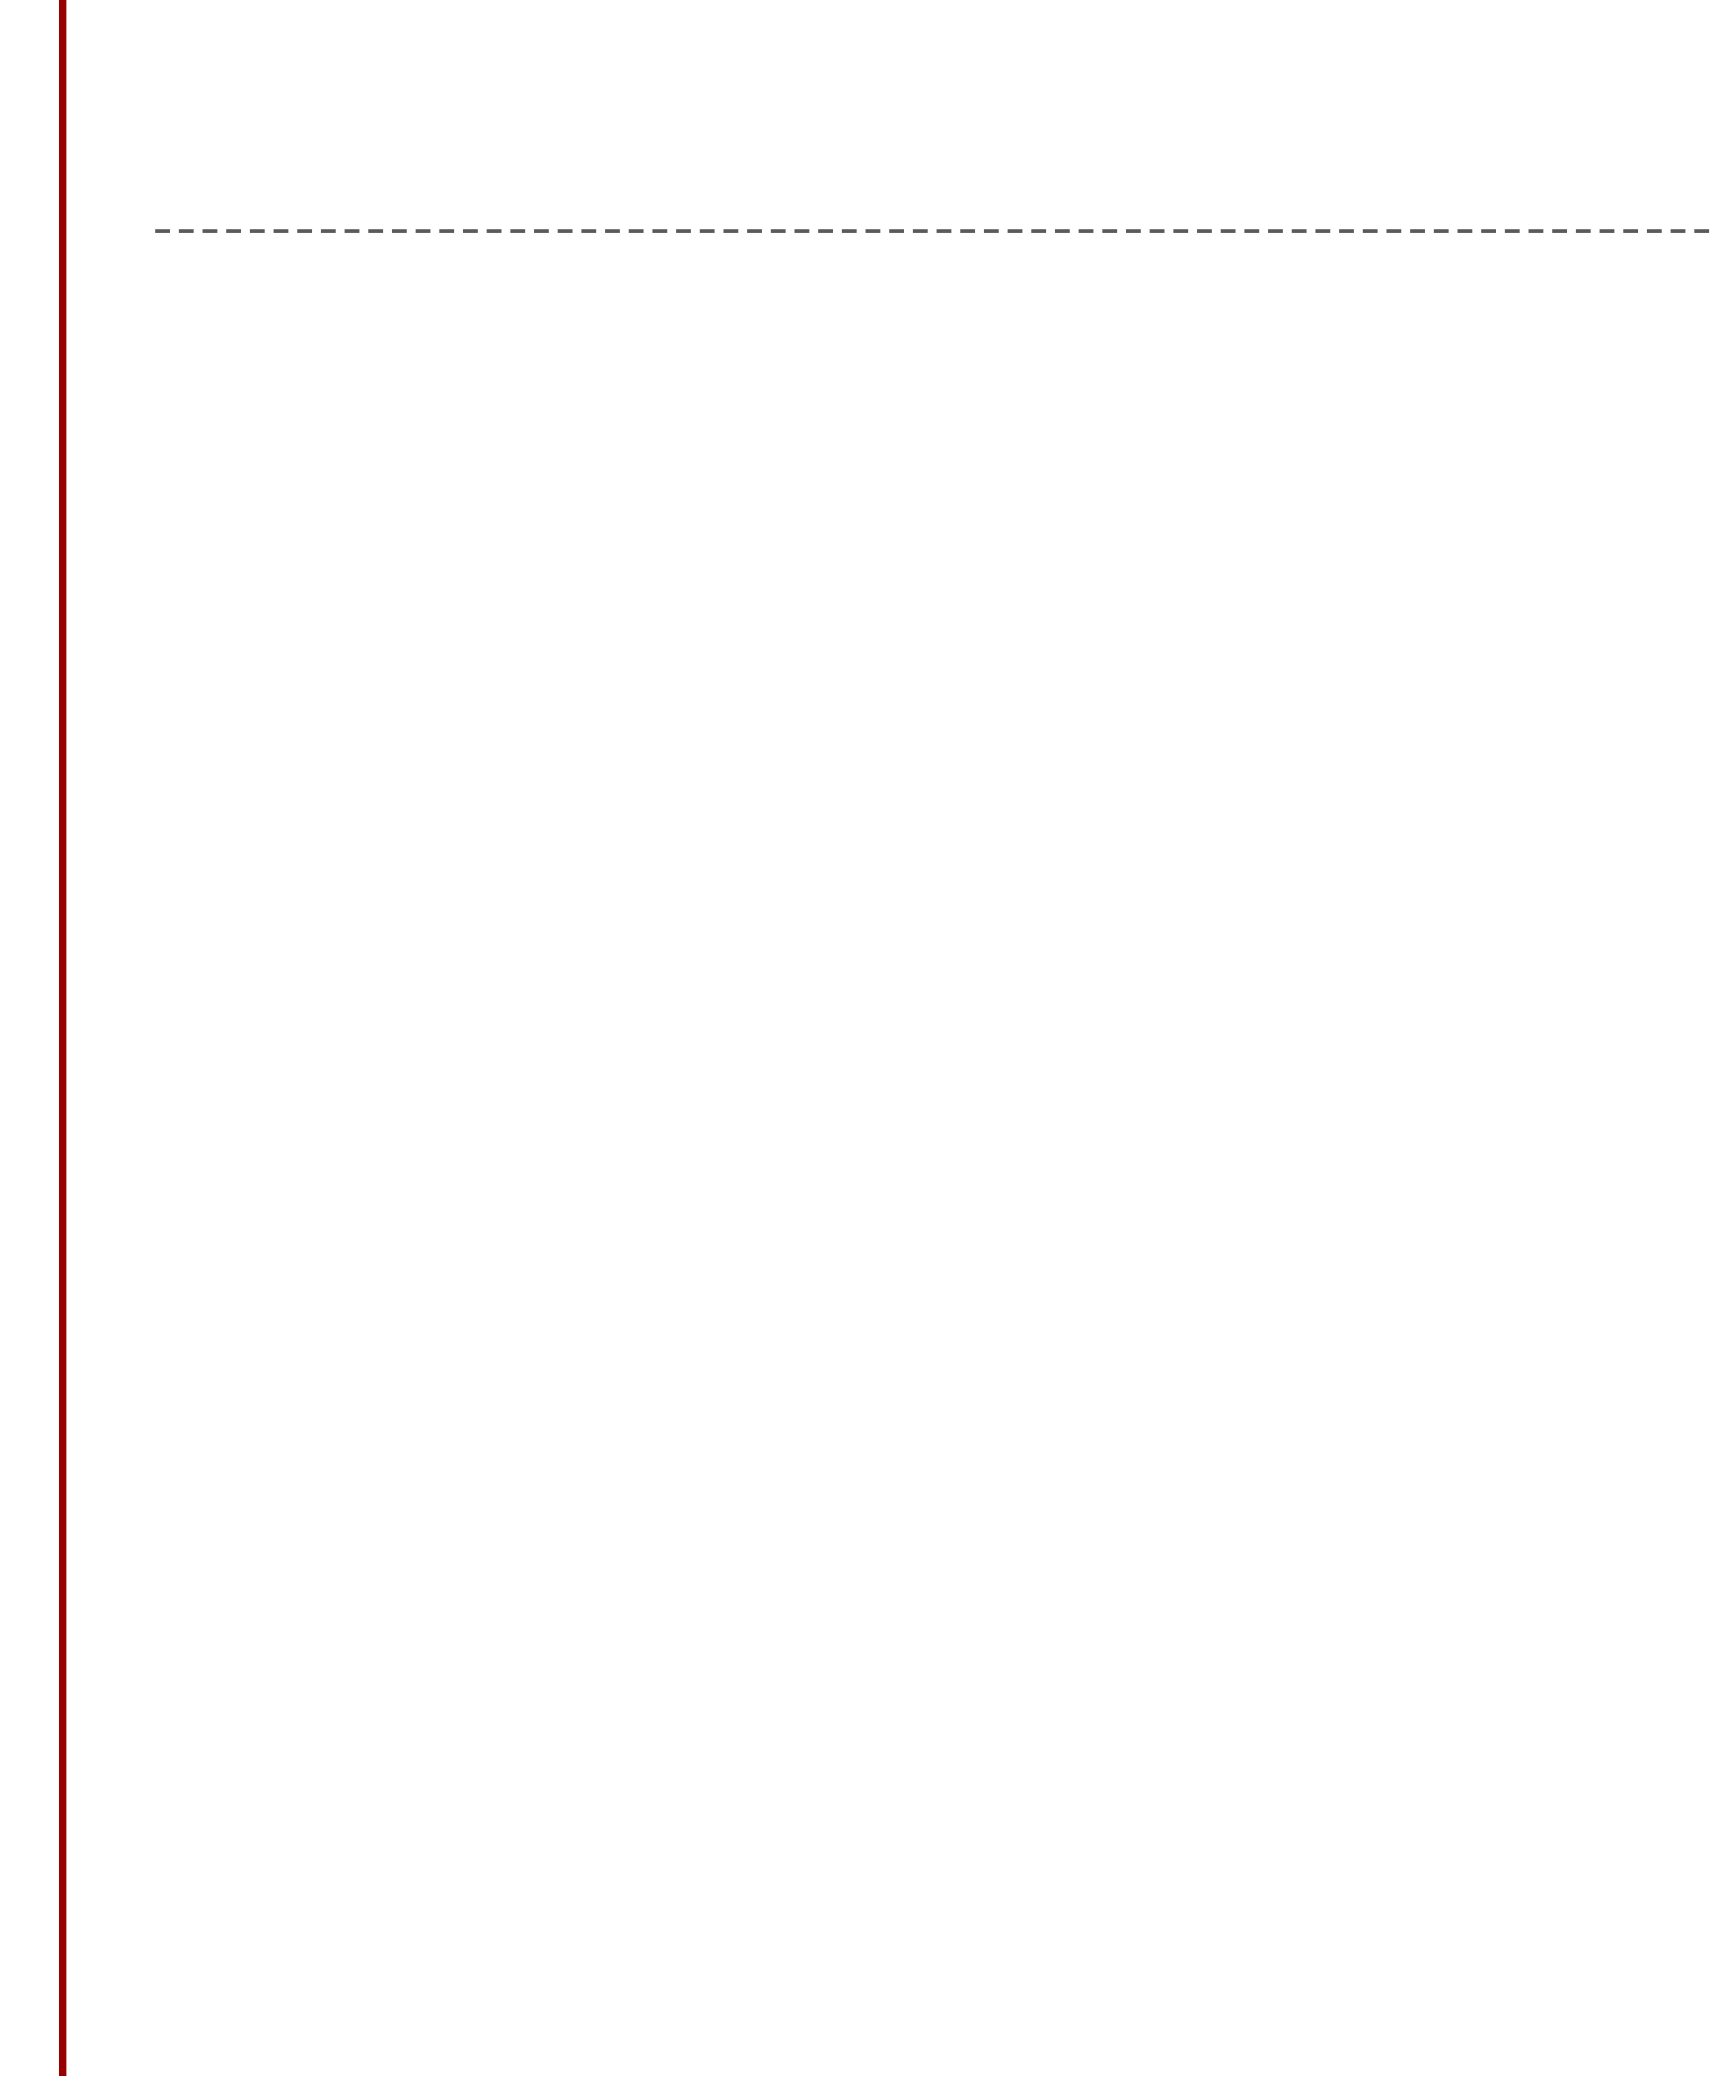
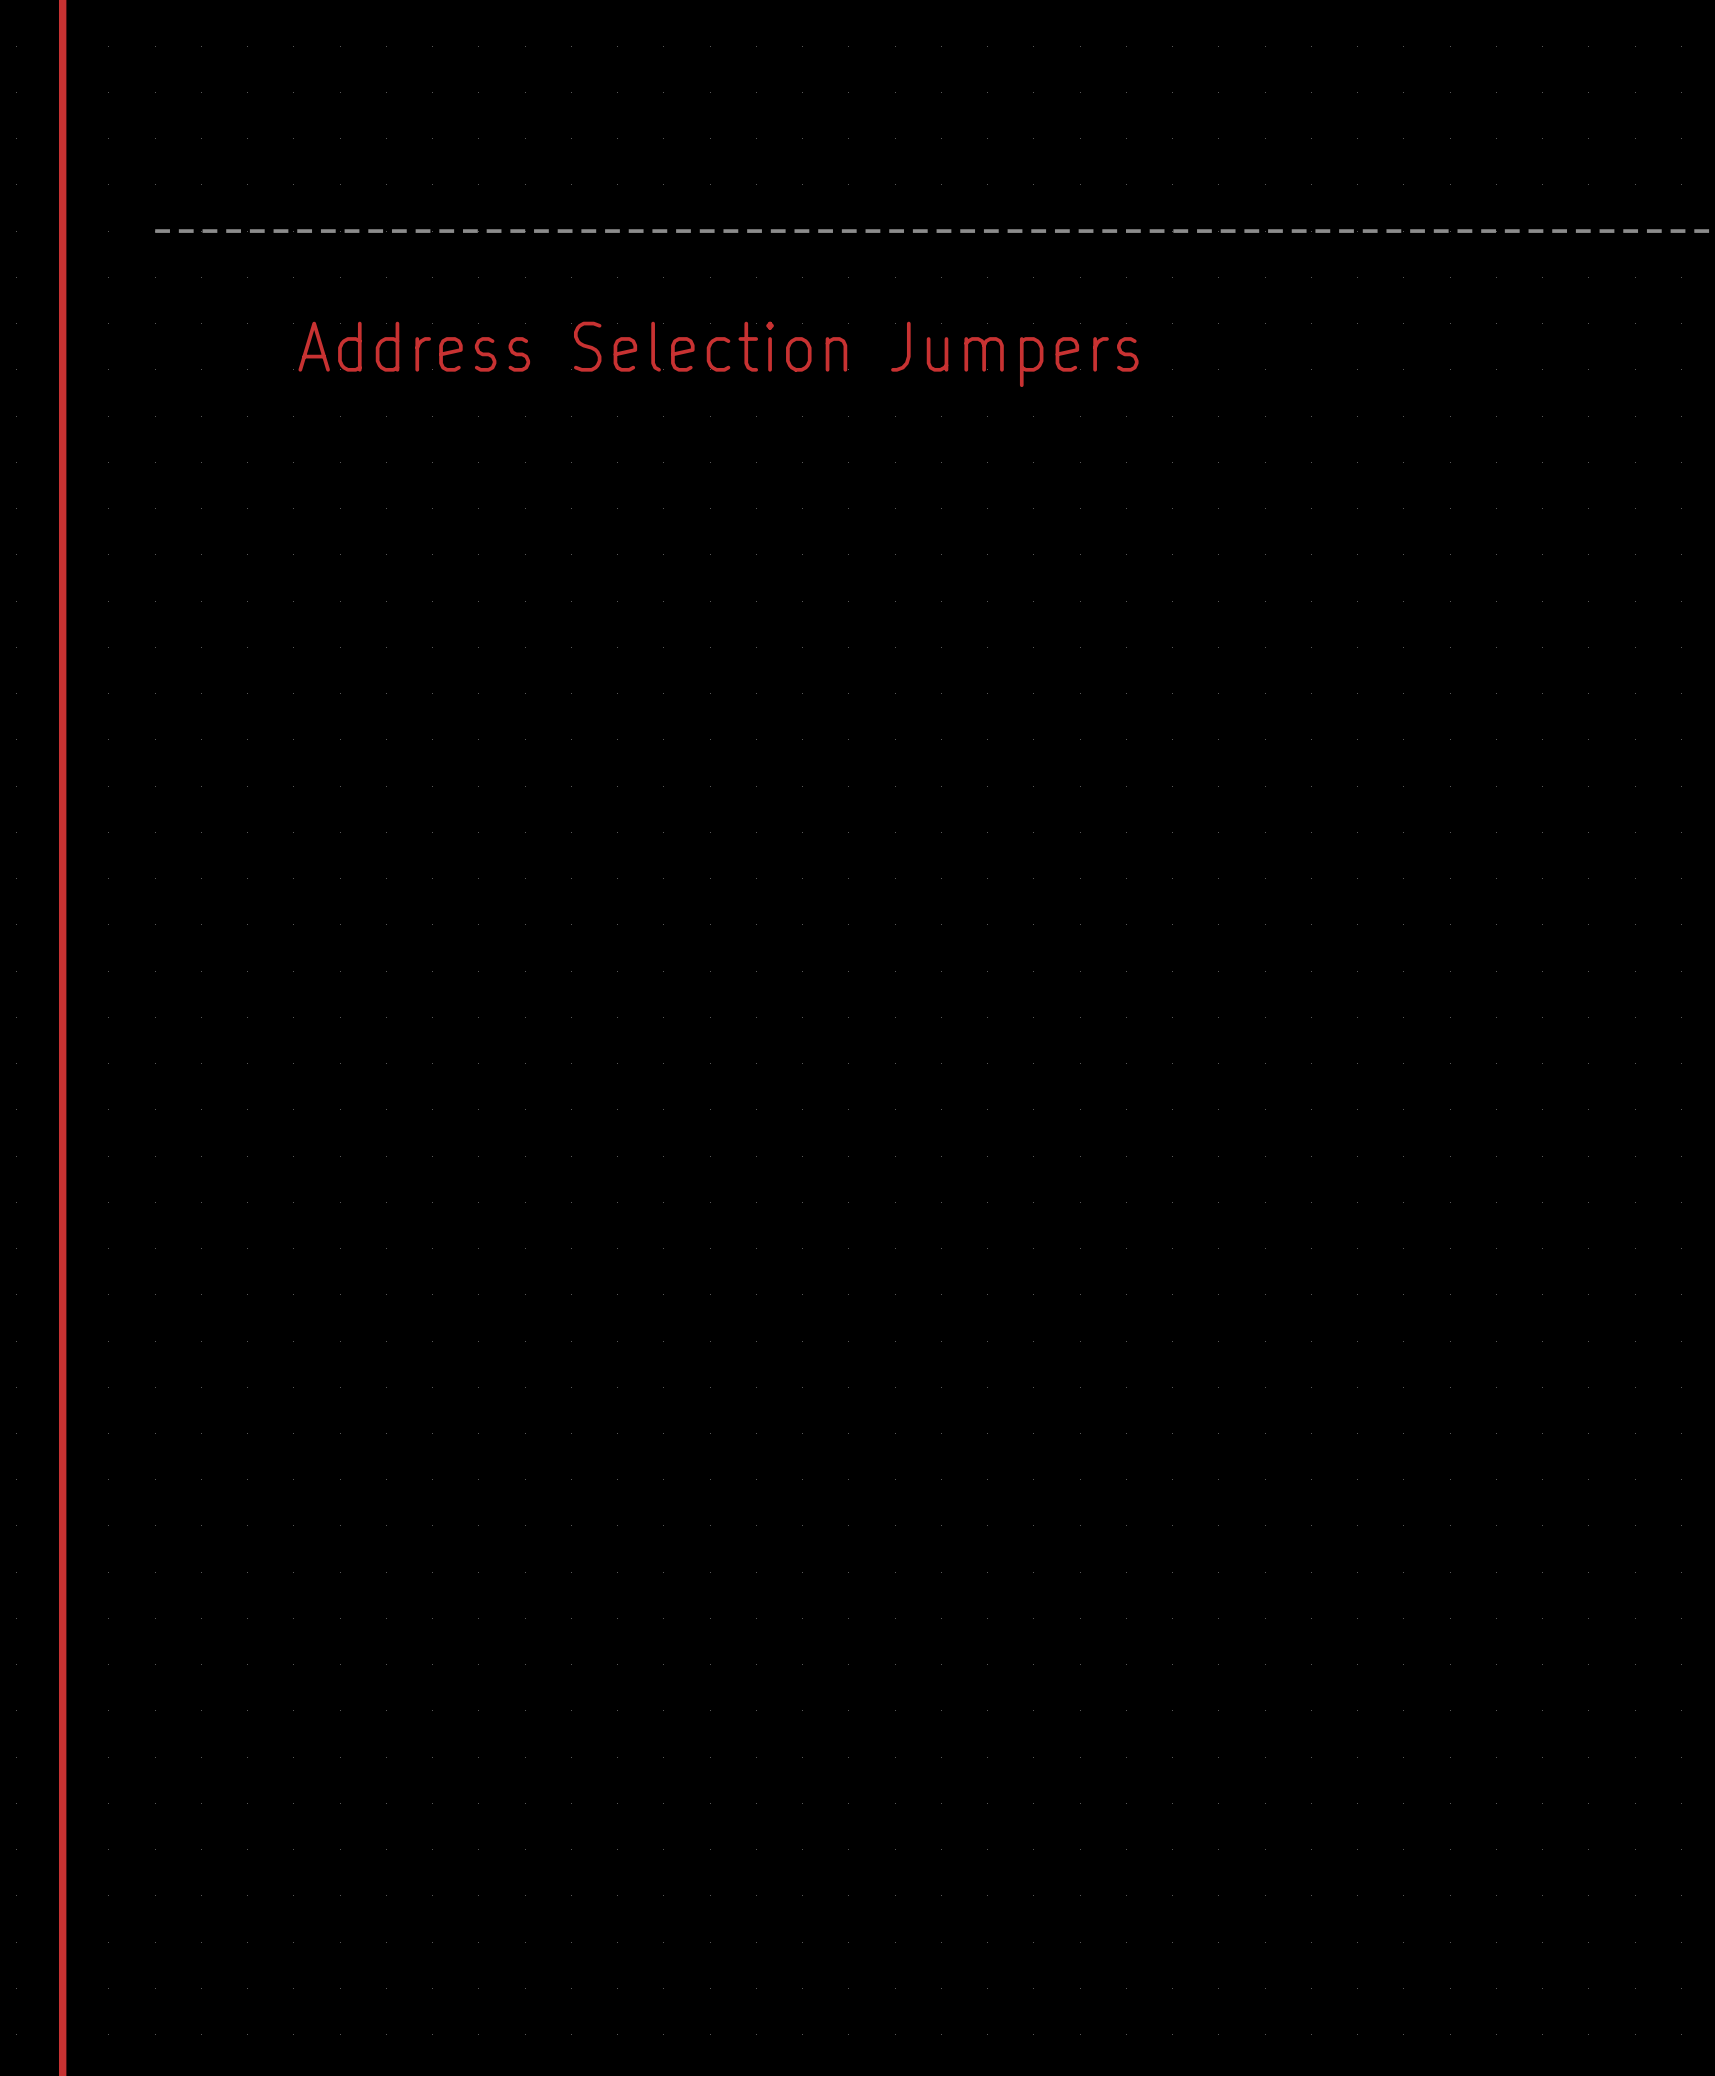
text: none -> Address Selection Jumpers (718, 354)

